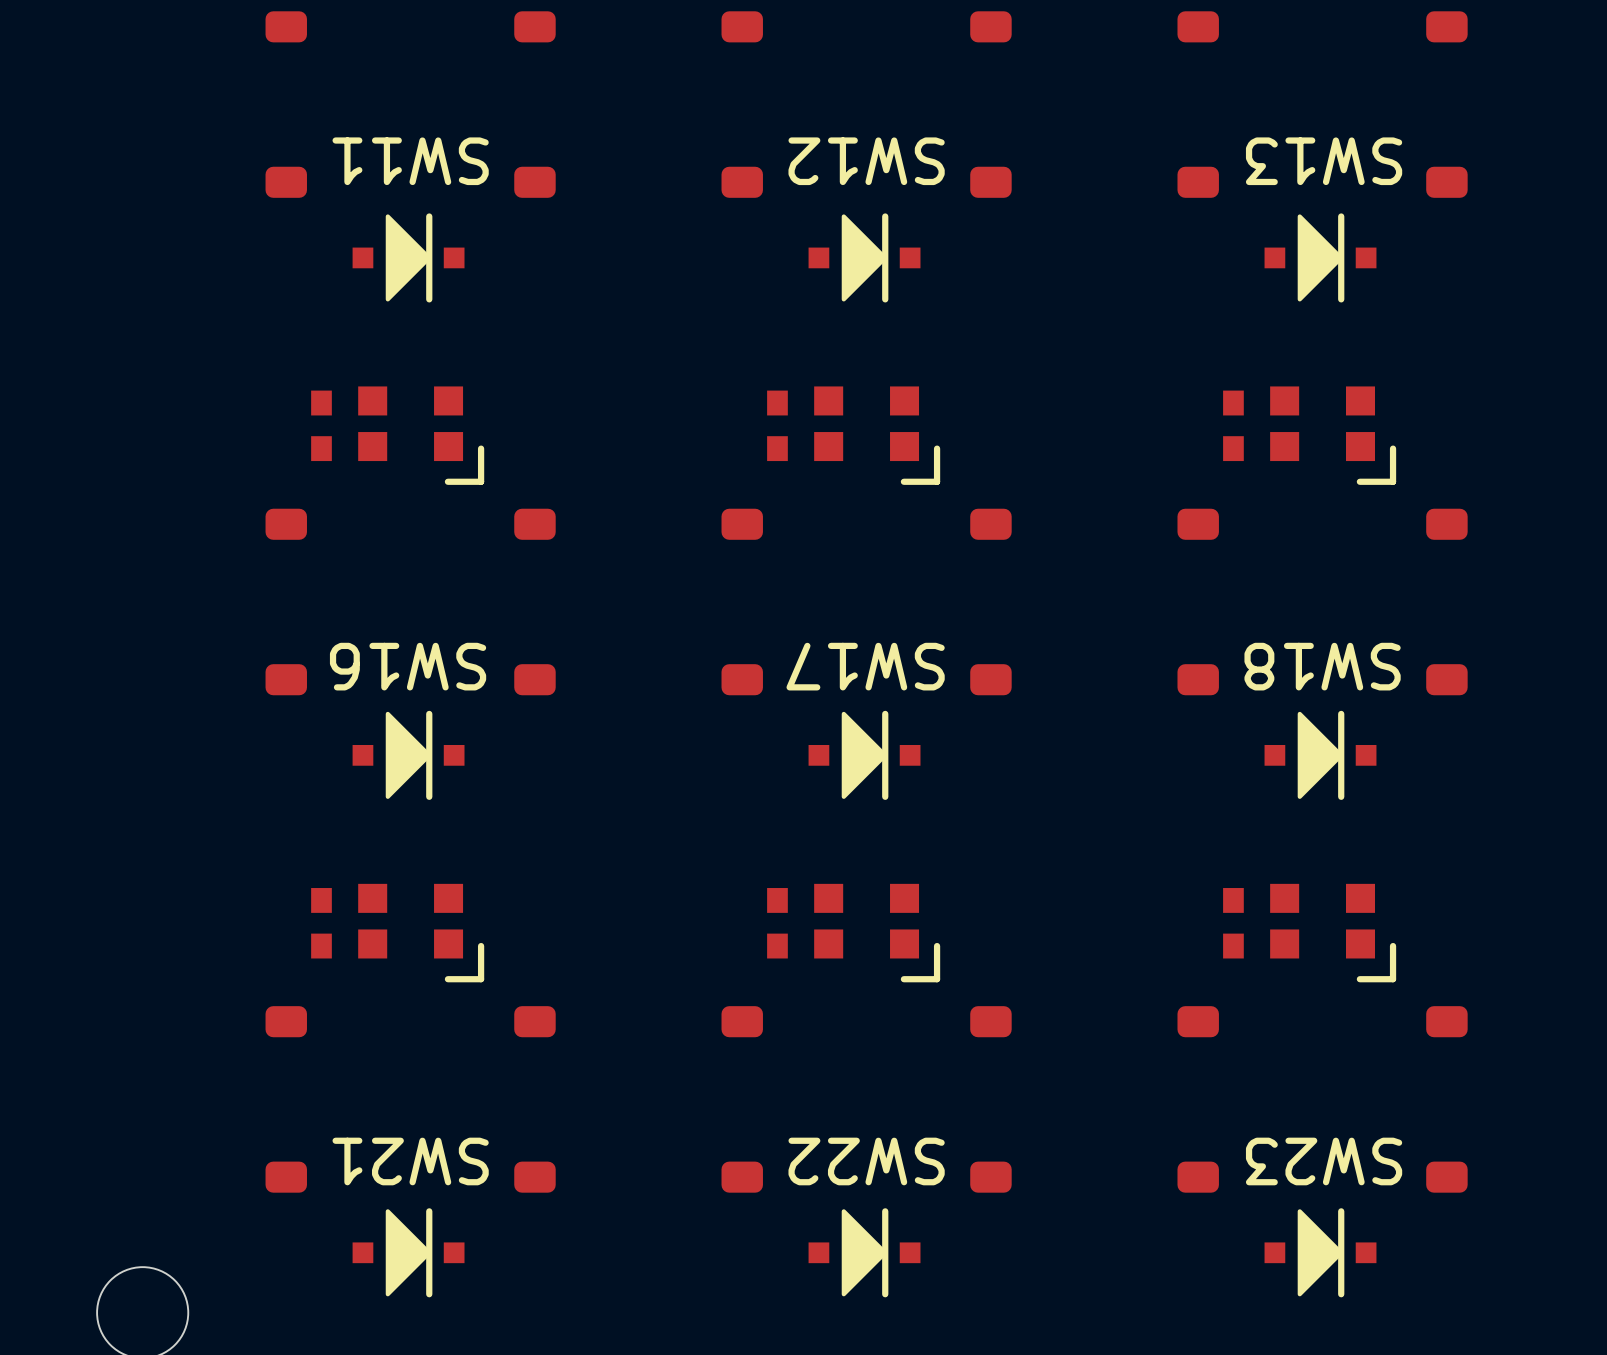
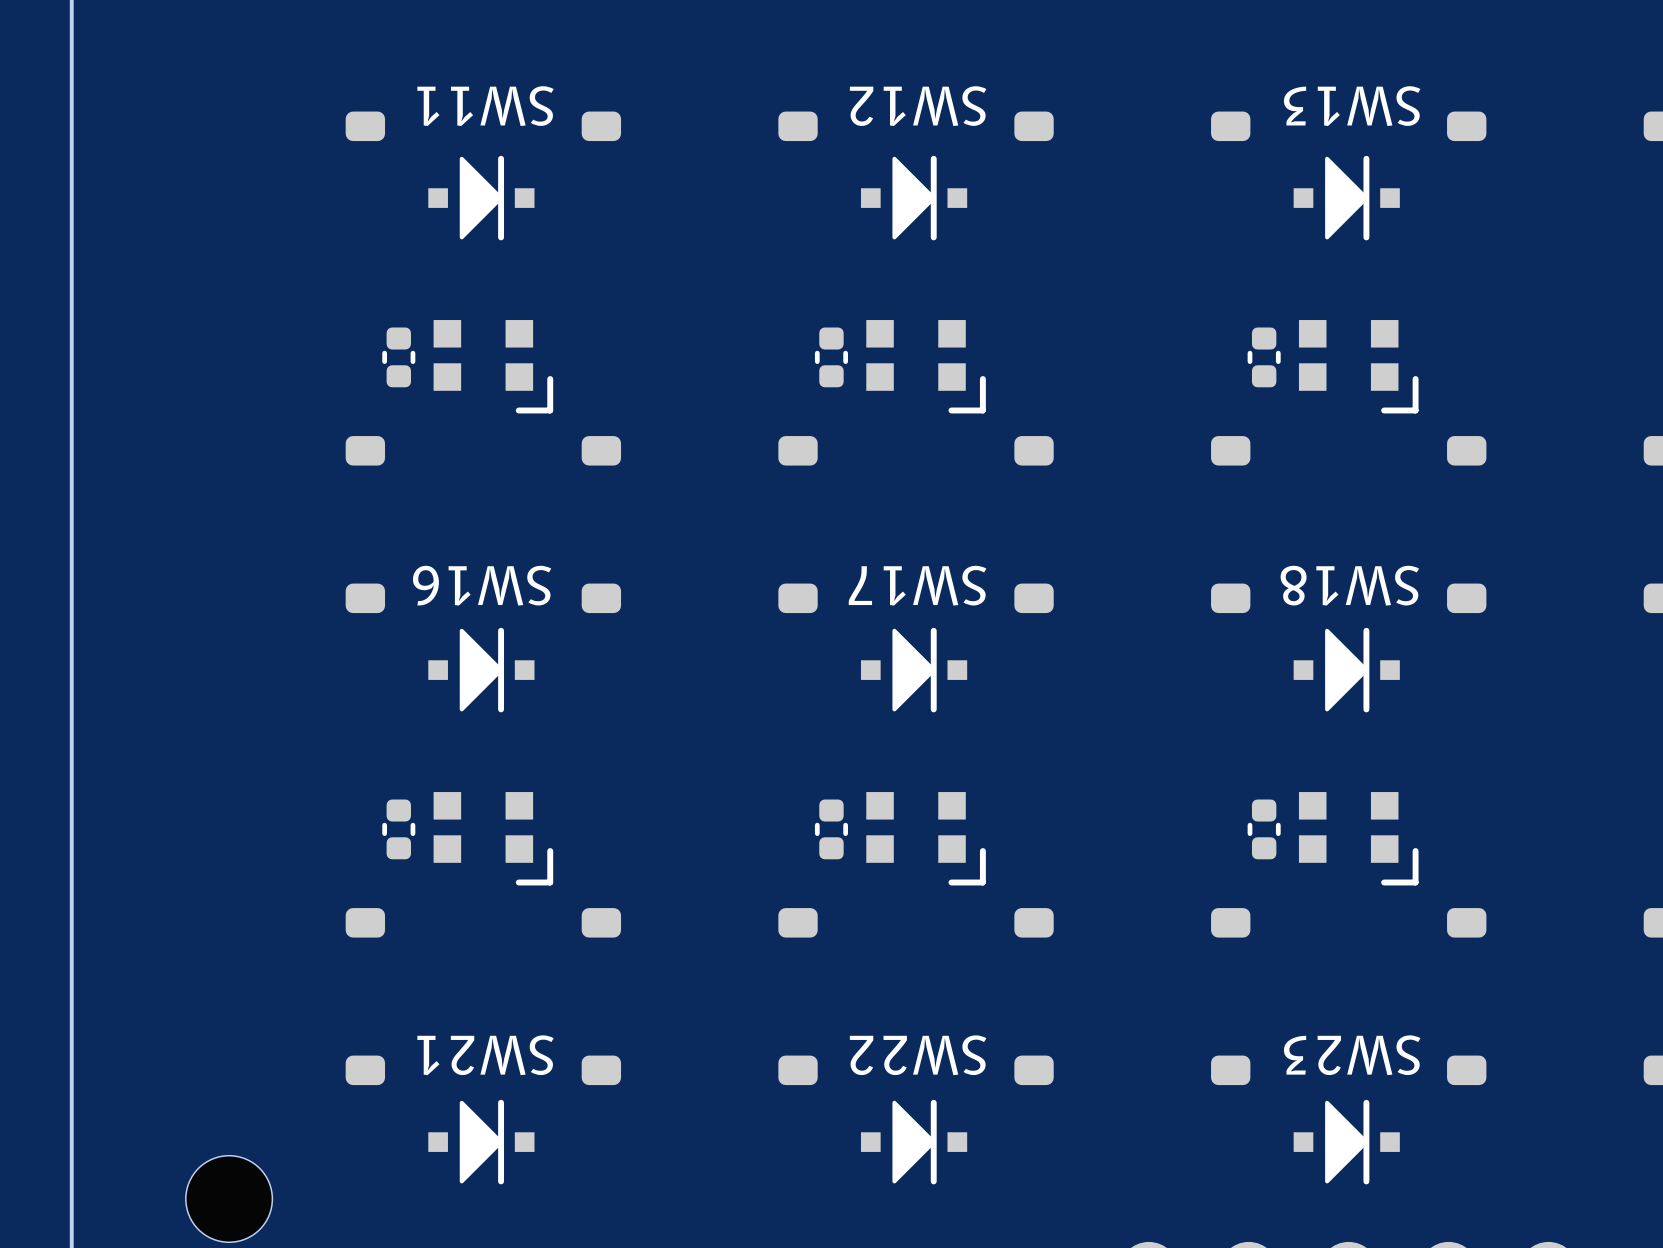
part footprint: [311, 390, 332, 462] -> [382, 327, 416, 388]
part footprint: [767, 390, 788, 462] -> [814, 327, 848, 388]
part footprint: [1223, 390, 1244, 462] -> [1247, 327, 1281, 388]
part footprint: [311, 888, 332, 959] -> [382, 799, 416, 860]
part footprint: [767, 888, 788, 959] -> [814, 799, 848, 860]
part footprint: [1223, 888, 1244, 959] -> [1247, 799, 1281, 860]

